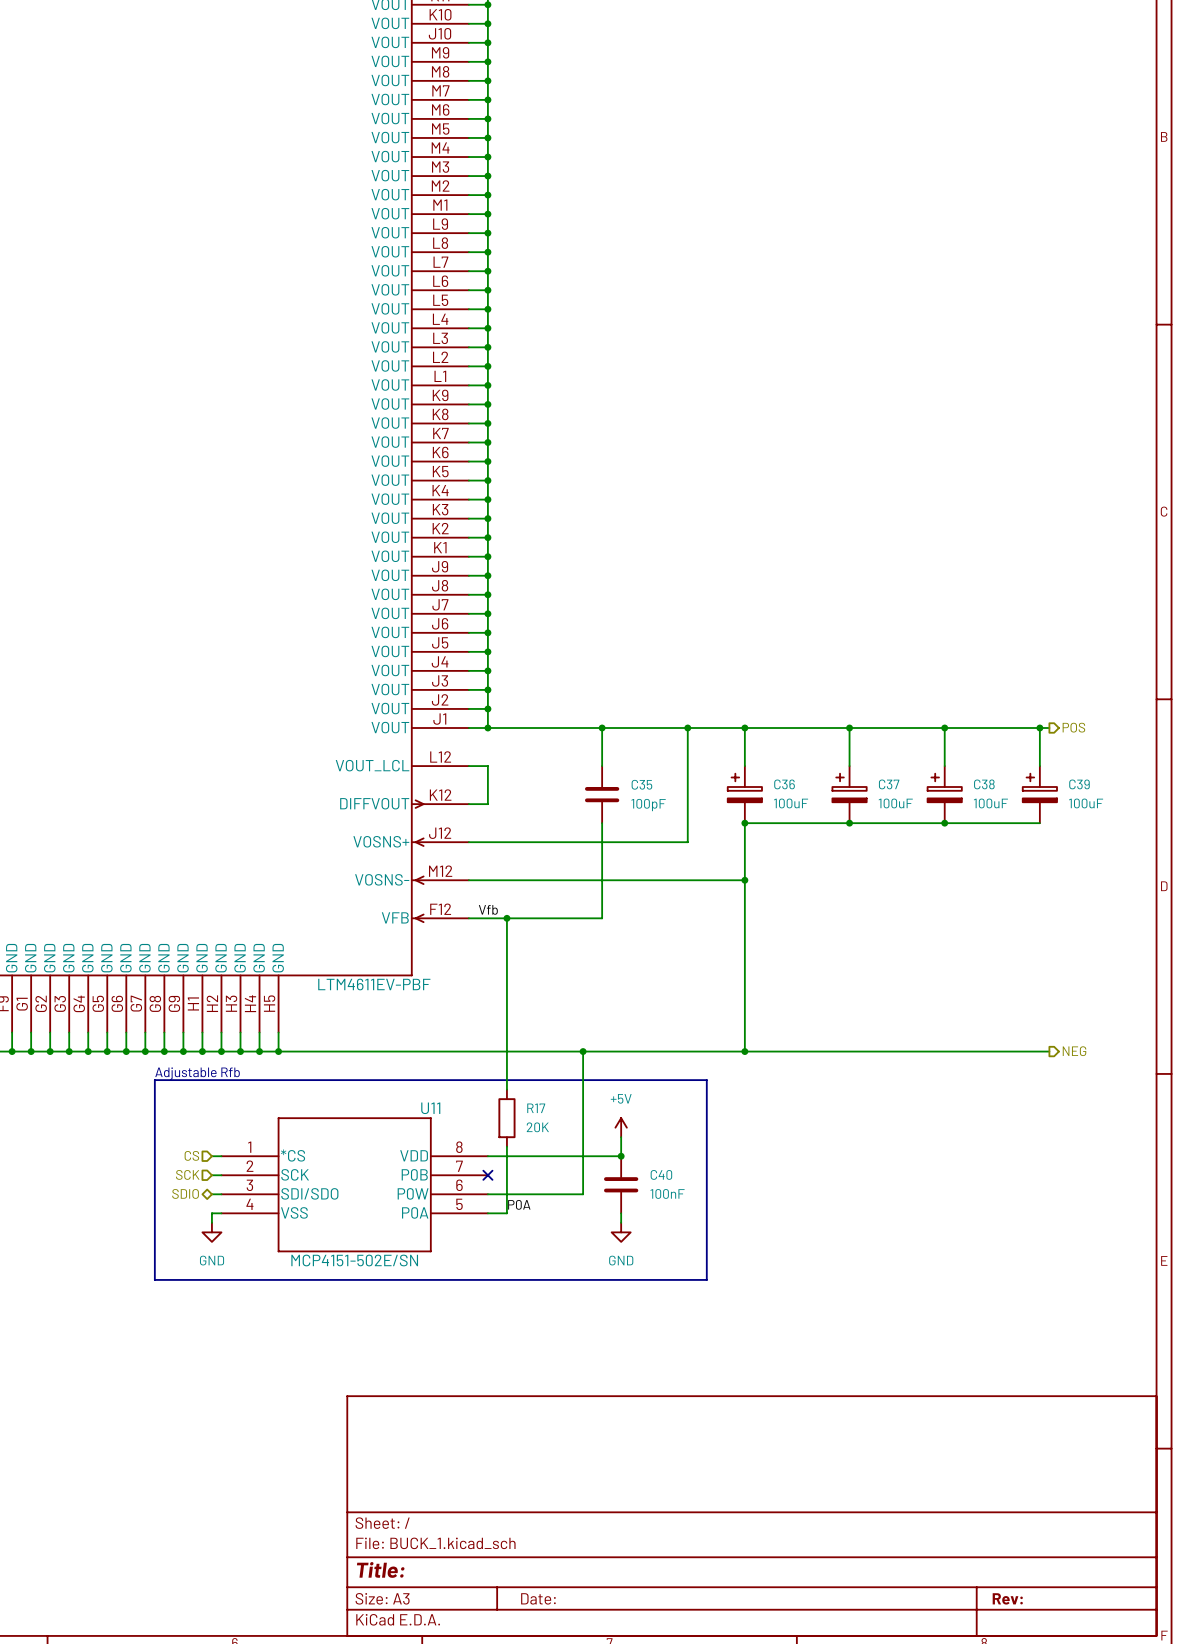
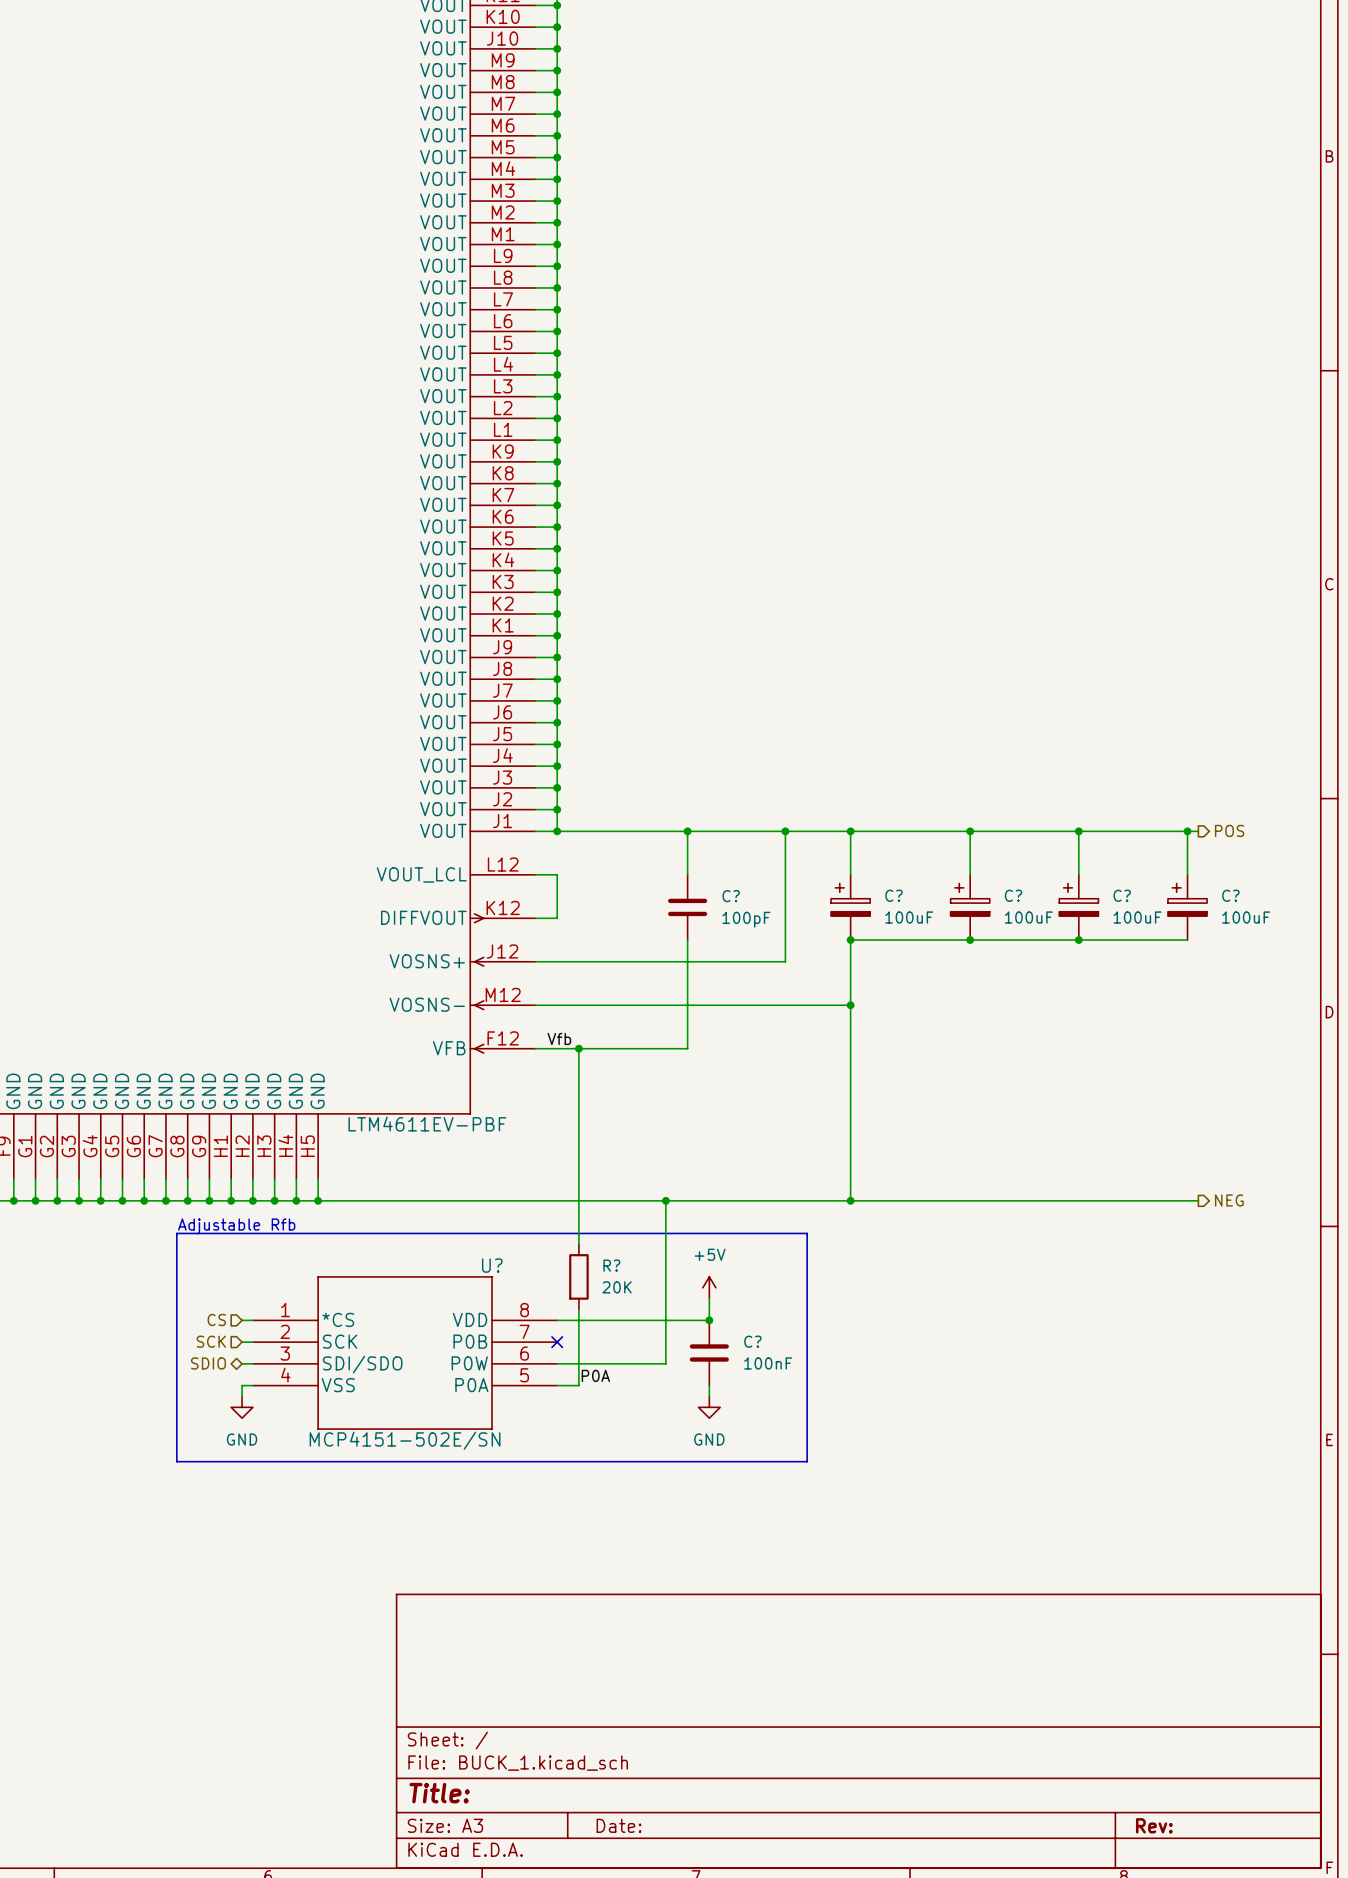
C35 name: C35 (641, 784) -> C? (731, 896)
C36 name: C36 (784, 784) -> C? (894, 895)
C37 name: C37 (889, 784) -> C? (1013, 895)
C38 name: C38 (984, 784) -> C? (1122, 895)
C39 name: C39 (1079, 784) -> C? (1230, 895)
U11 name: U11 (430, 1108) -> U? (492, 1265)
R17 name: R17 (536, 1108) -> R? (611, 1265)
C40 name: C40 (661, 1174) -> C? (752, 1341)

